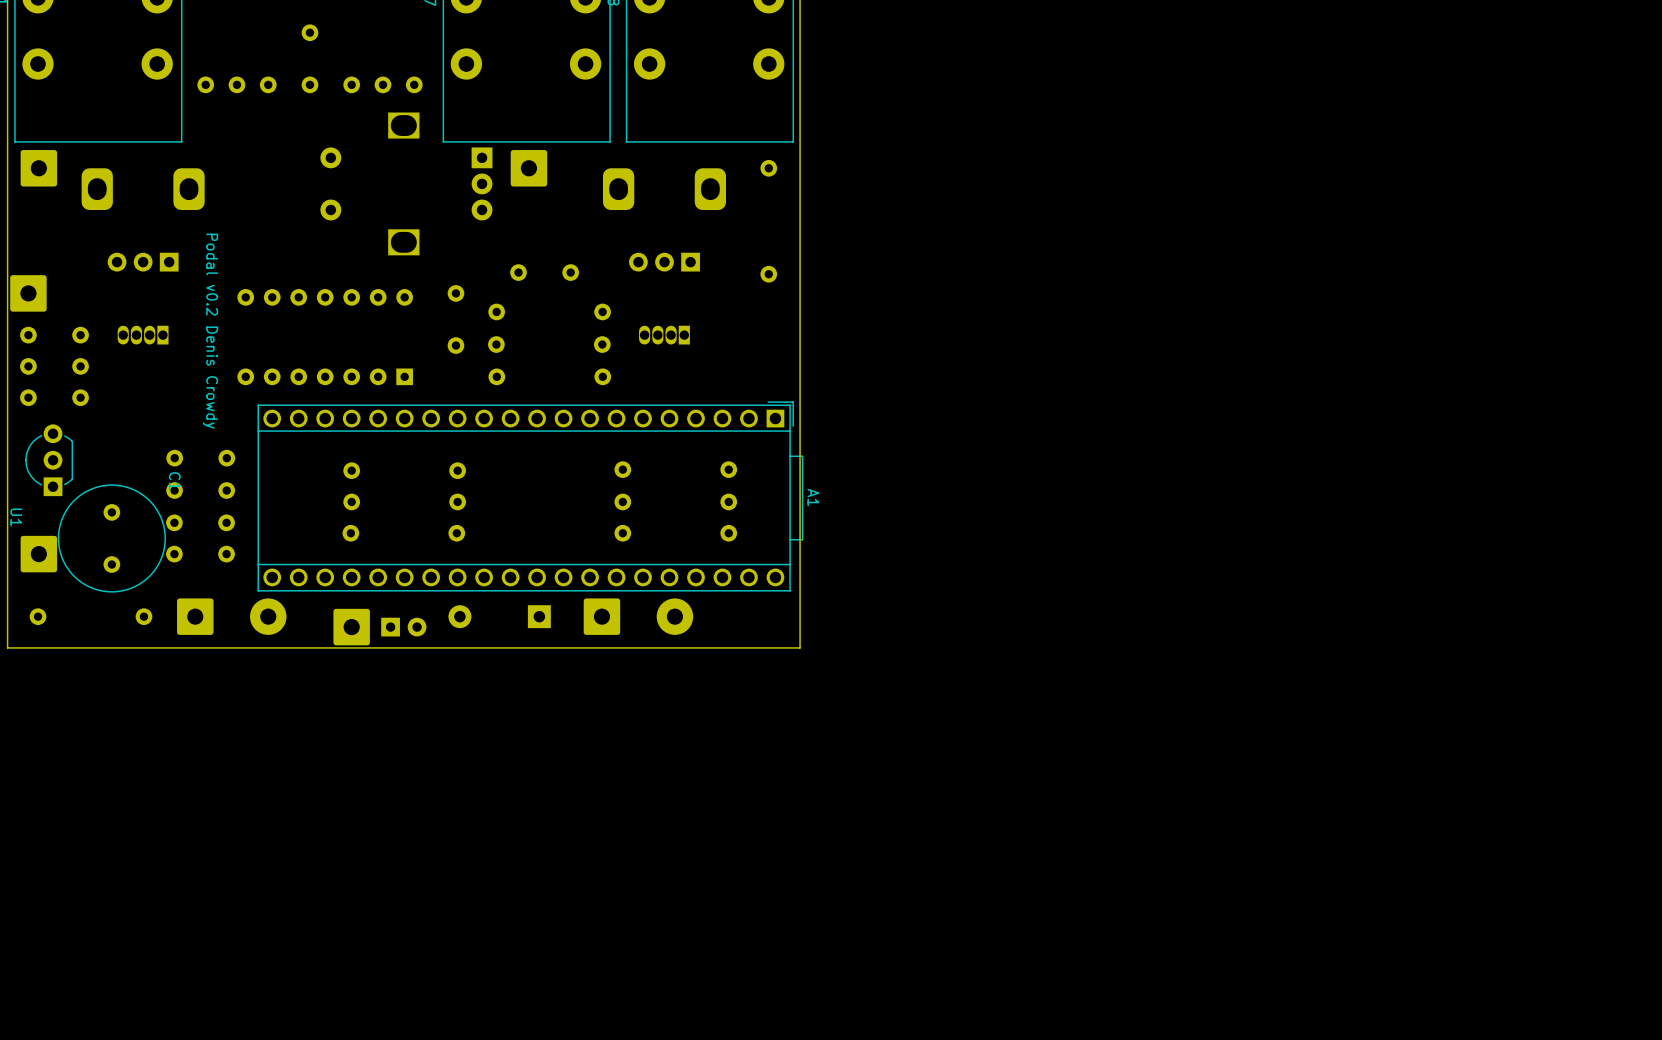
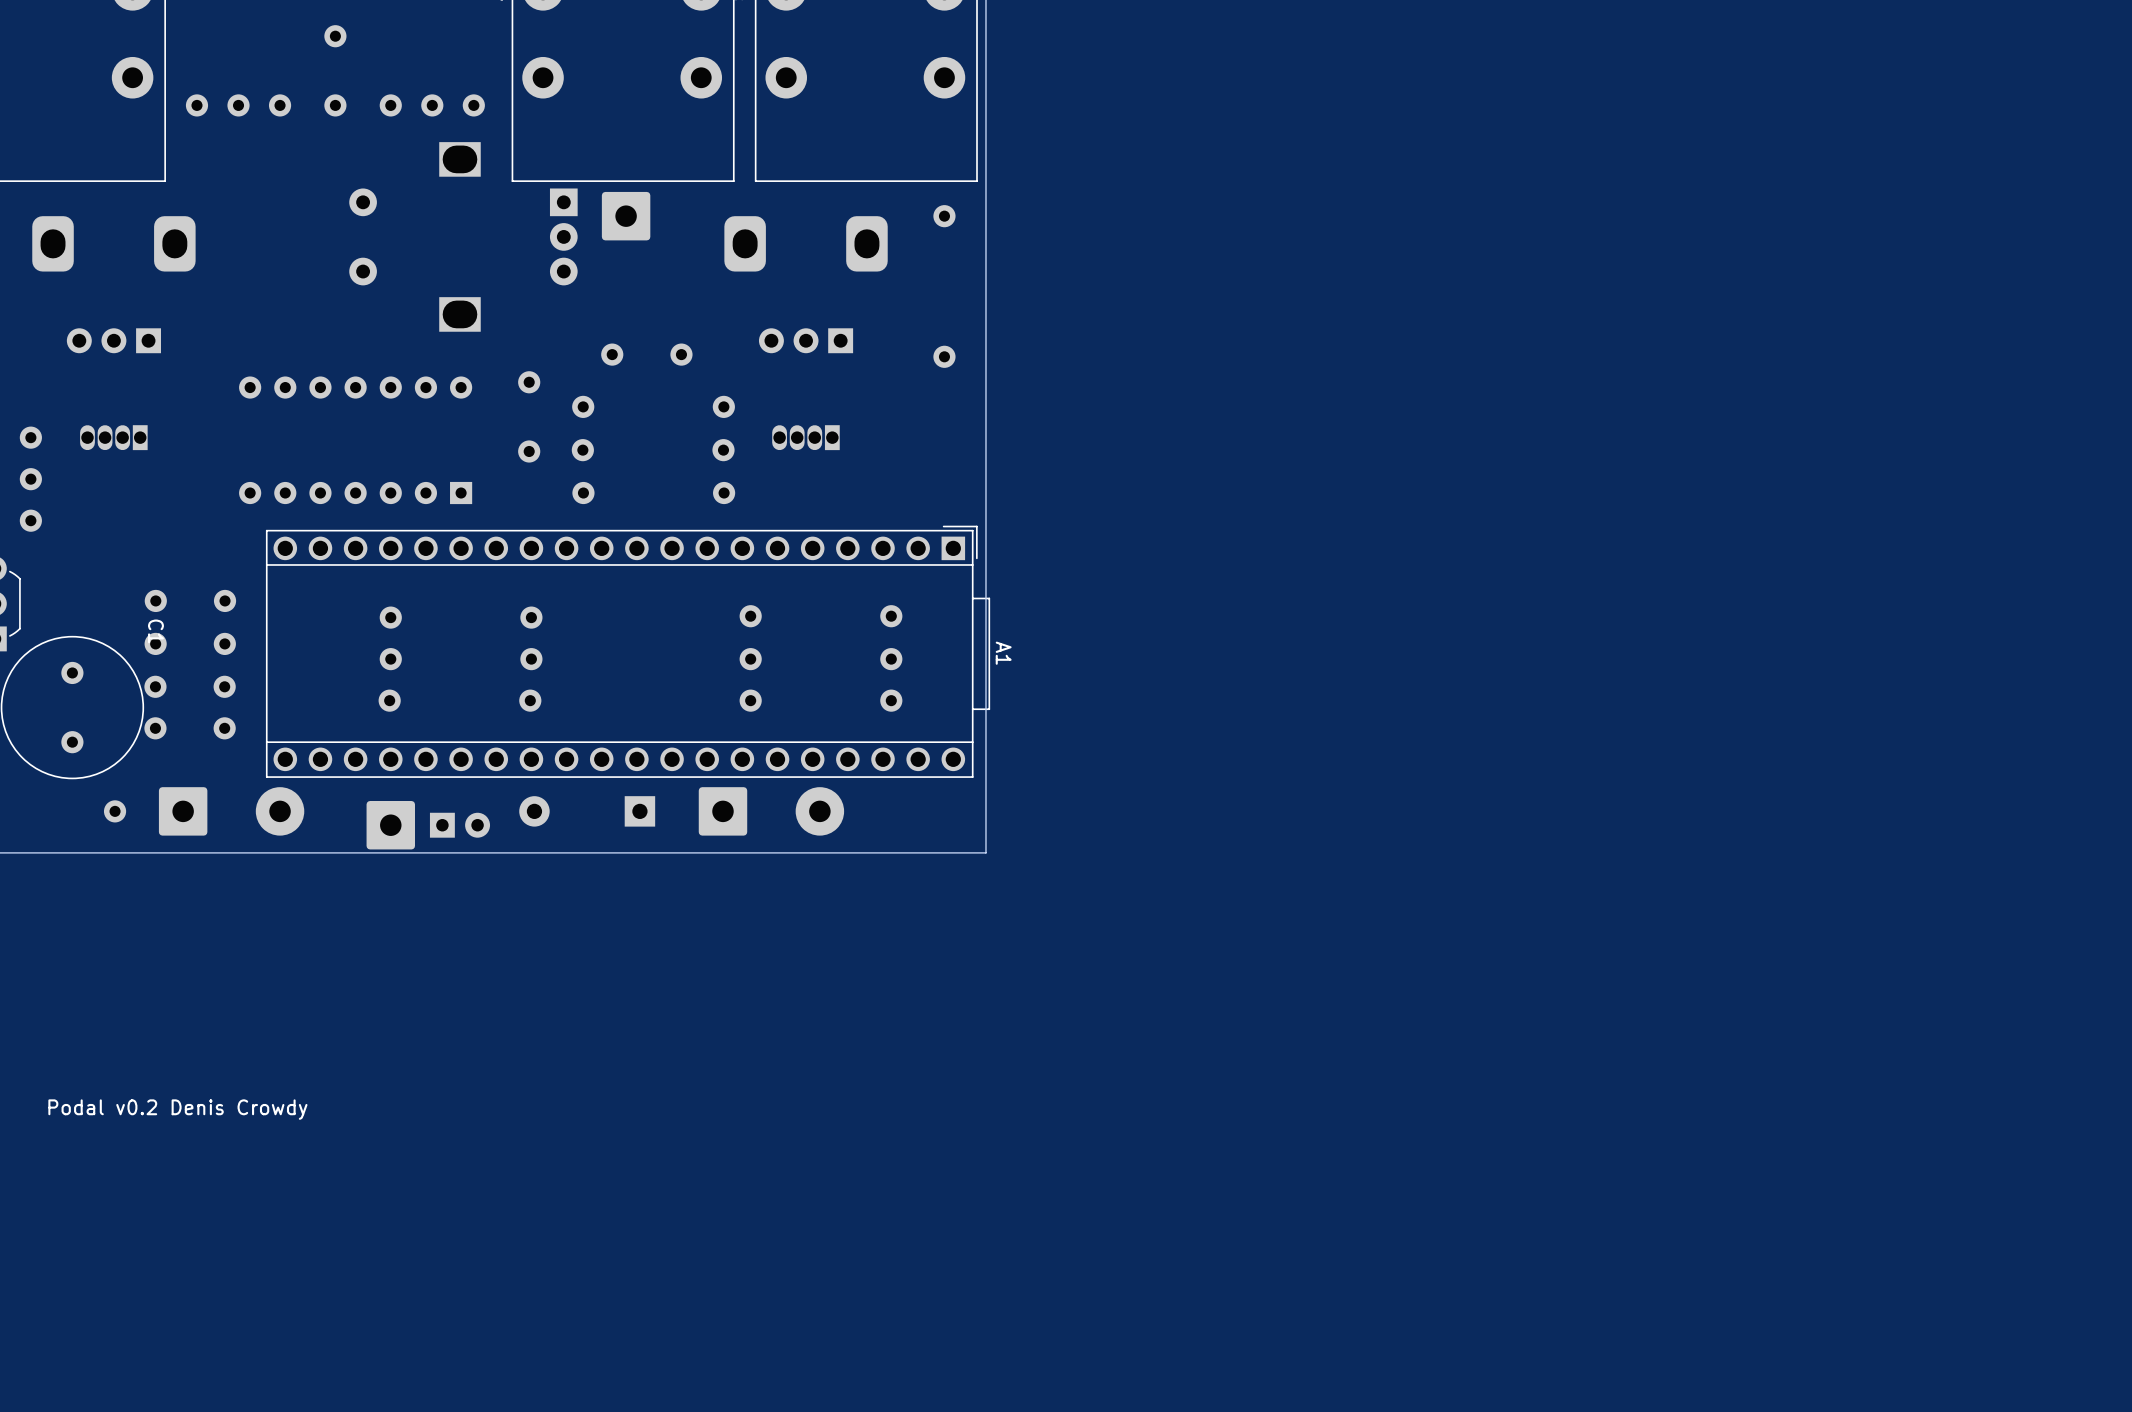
text: Podal v0.2 Denis Crowdy (210, 331) -> none
text: none -> Podal v0.2 Denis Crowdy (177, 1109)

